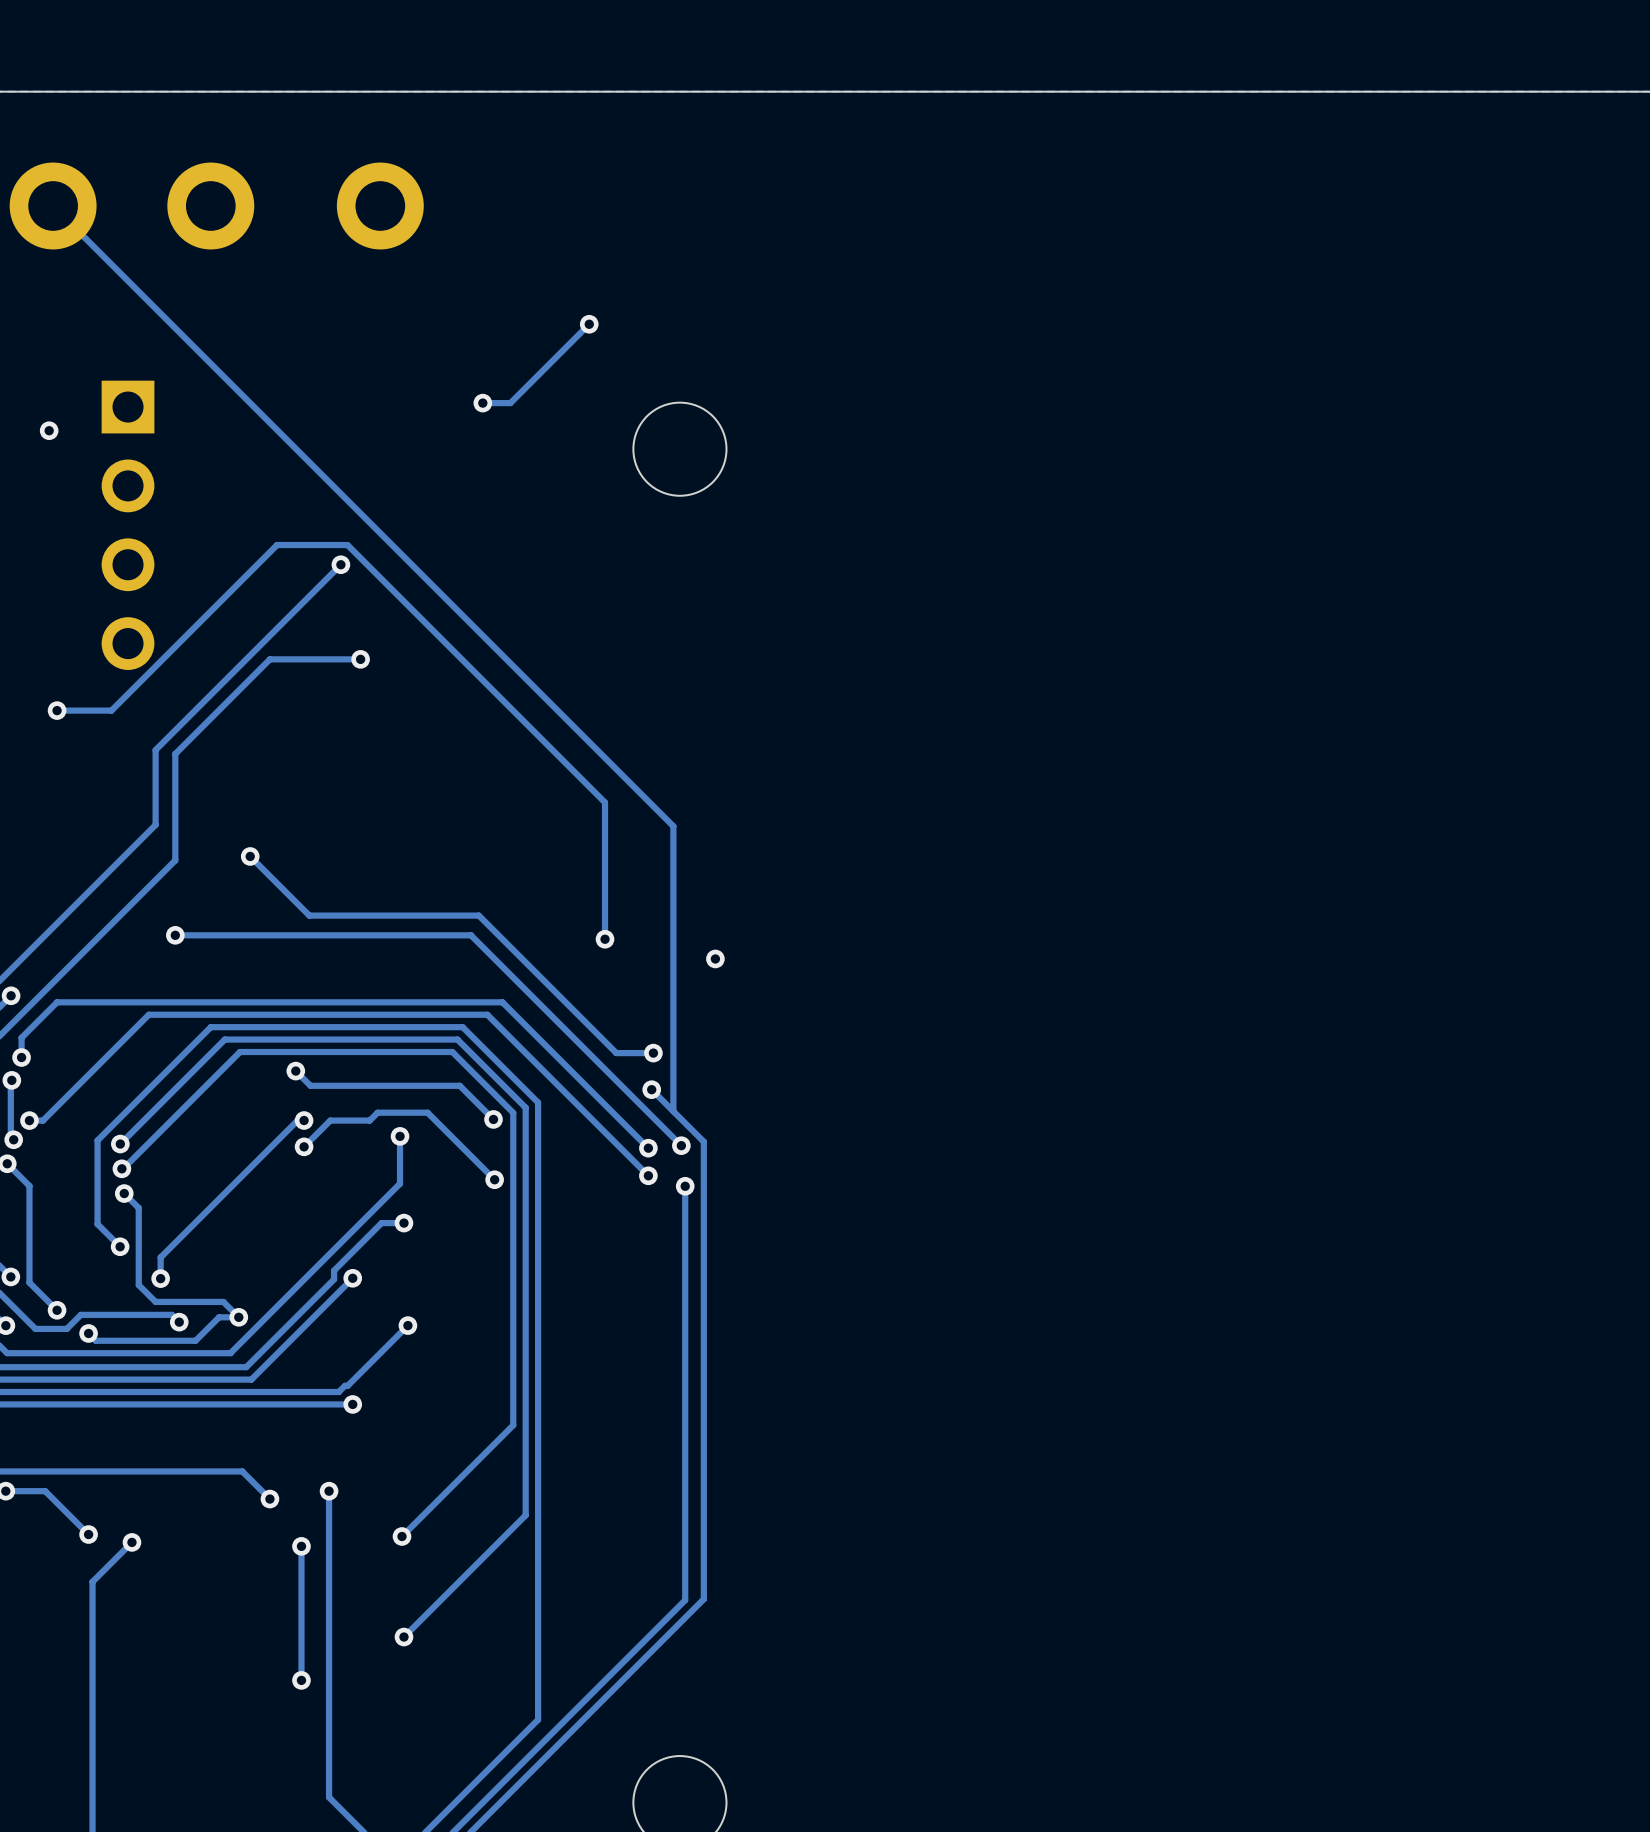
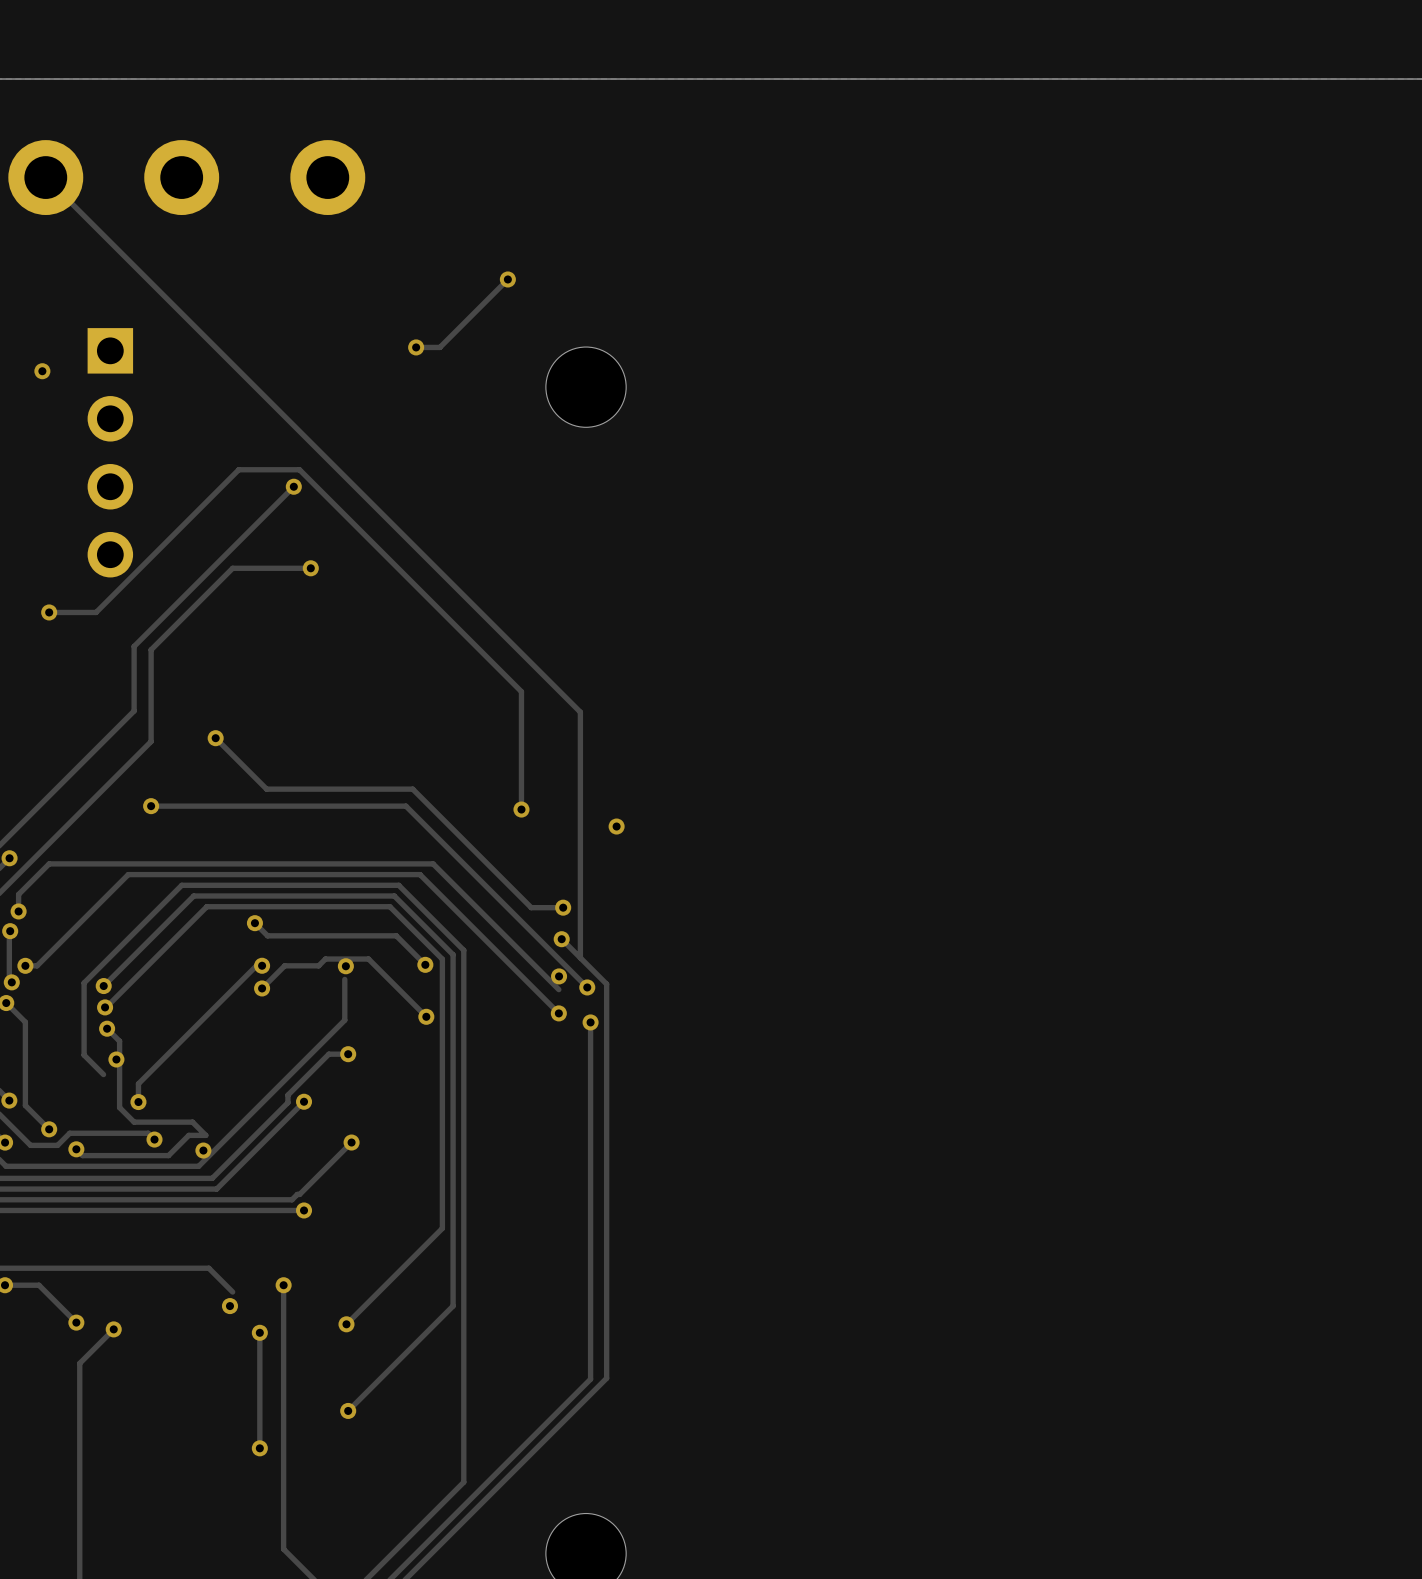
via position: (400, 1136) -> (345, 966)
via position: (648, 1148) -> (559, 976)
via position: (120, 1246) -> (116, 1059)
via position: (238, 1317) -> (203, 1150)
via position: (269, 1499) -> (229, 1306)

